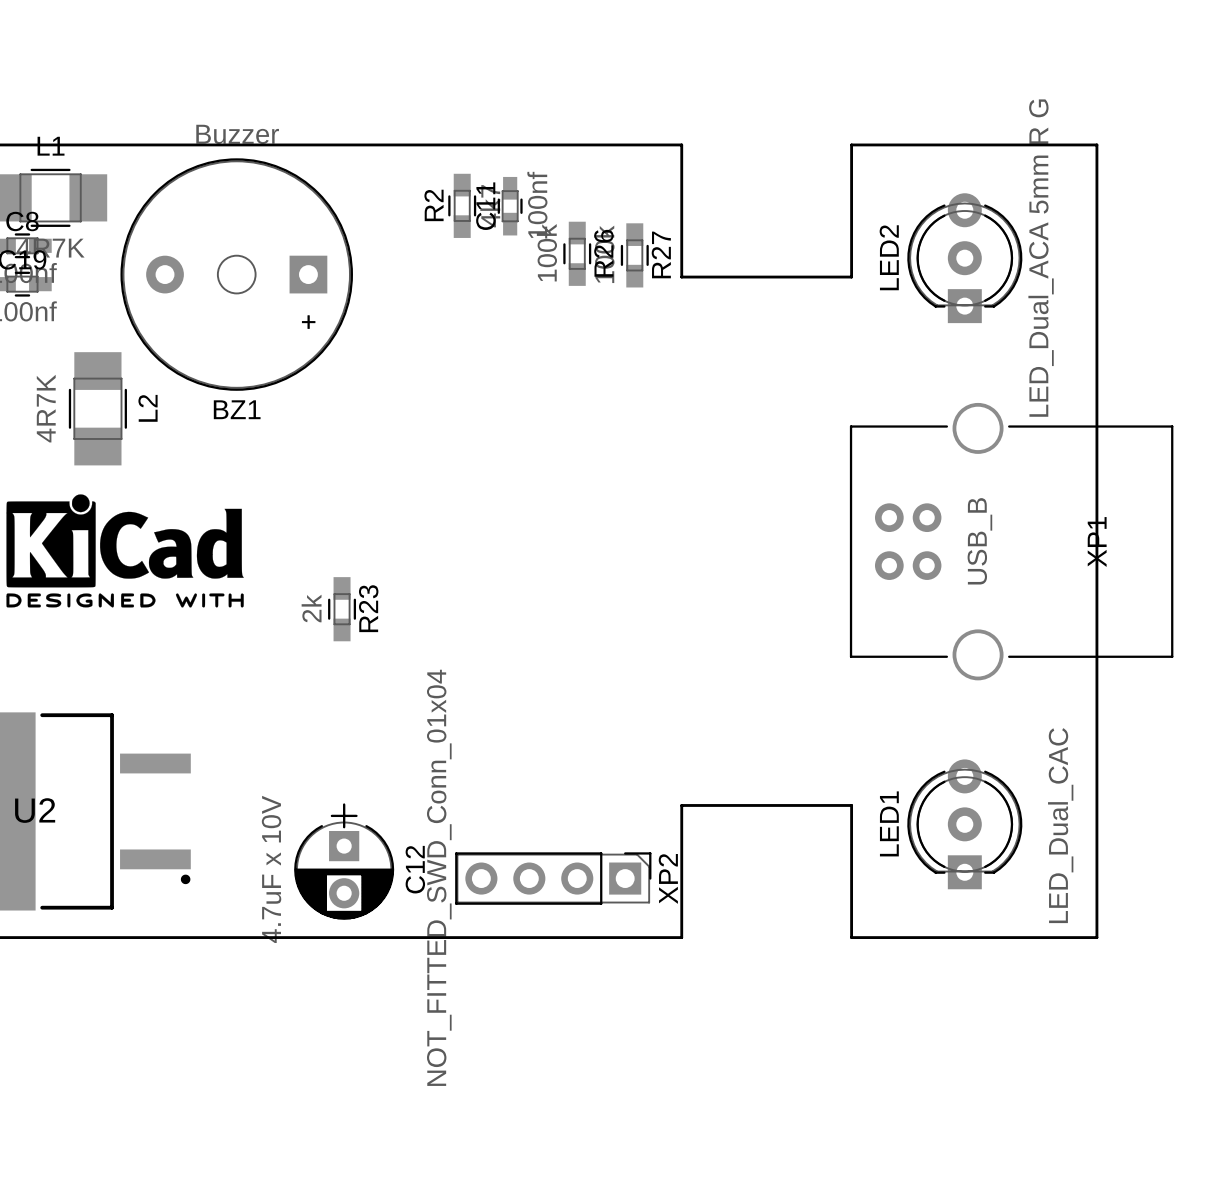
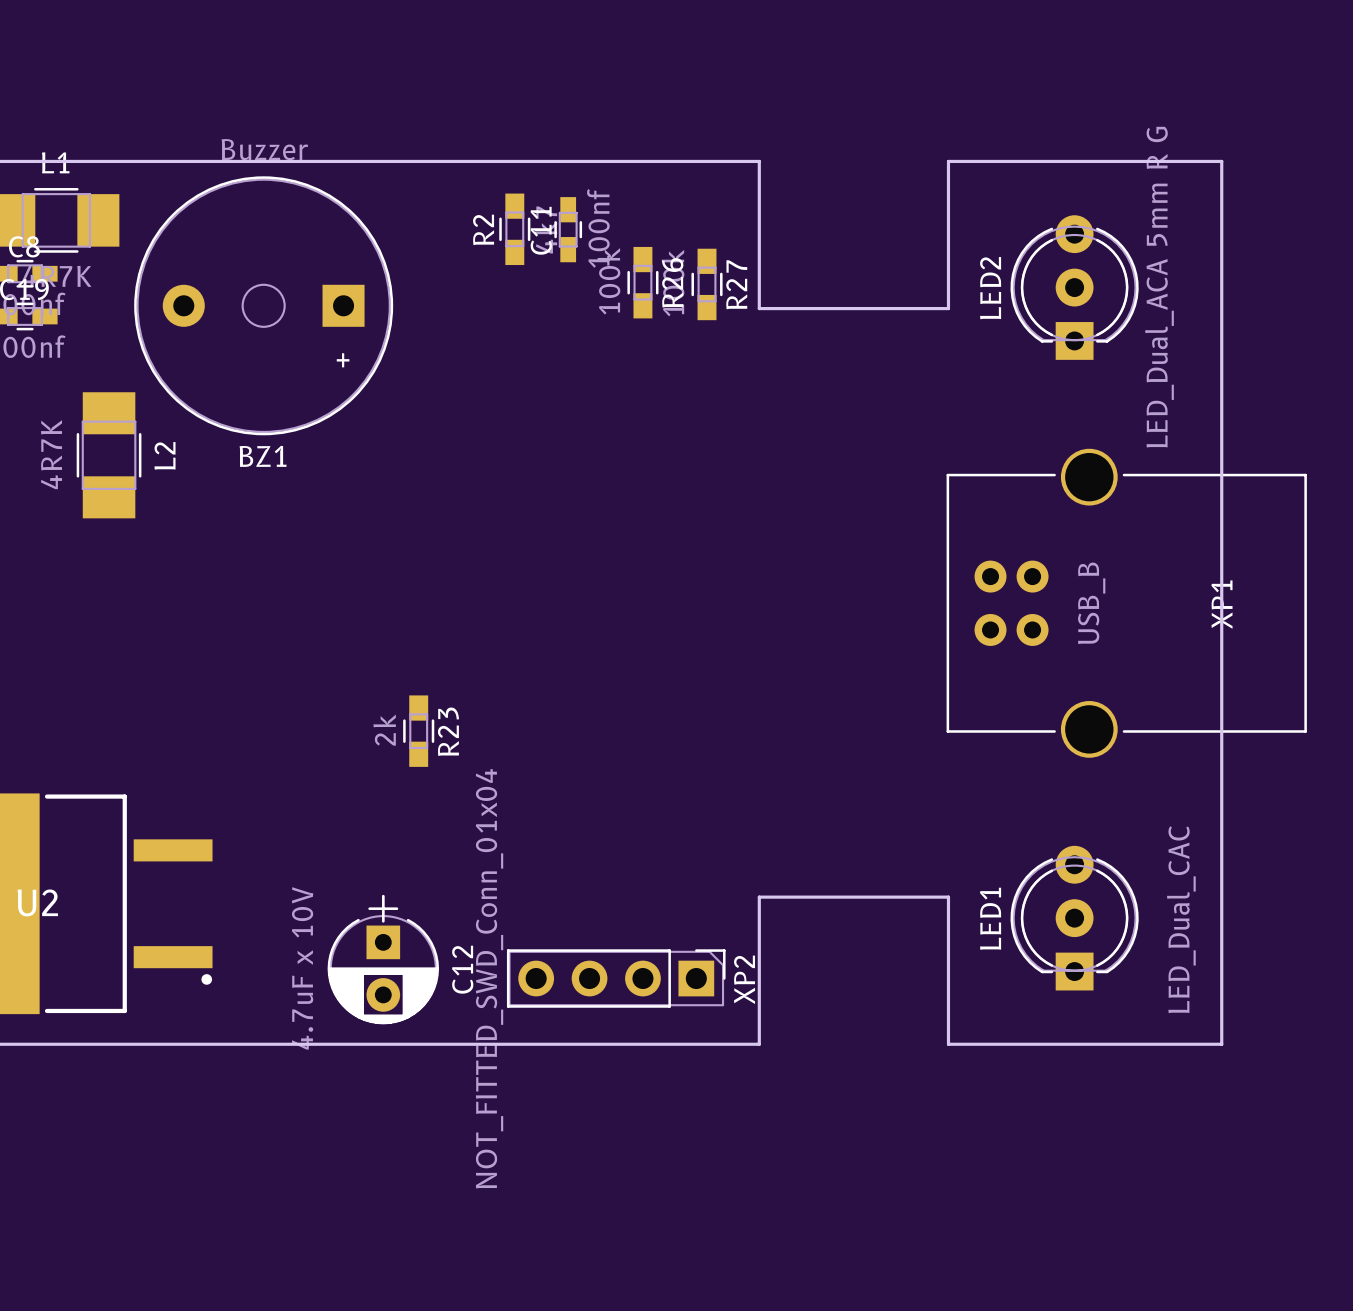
drawing: [6, 494, 244, 608] -> none
R23 position: (342, 609) -> (418, 731)

